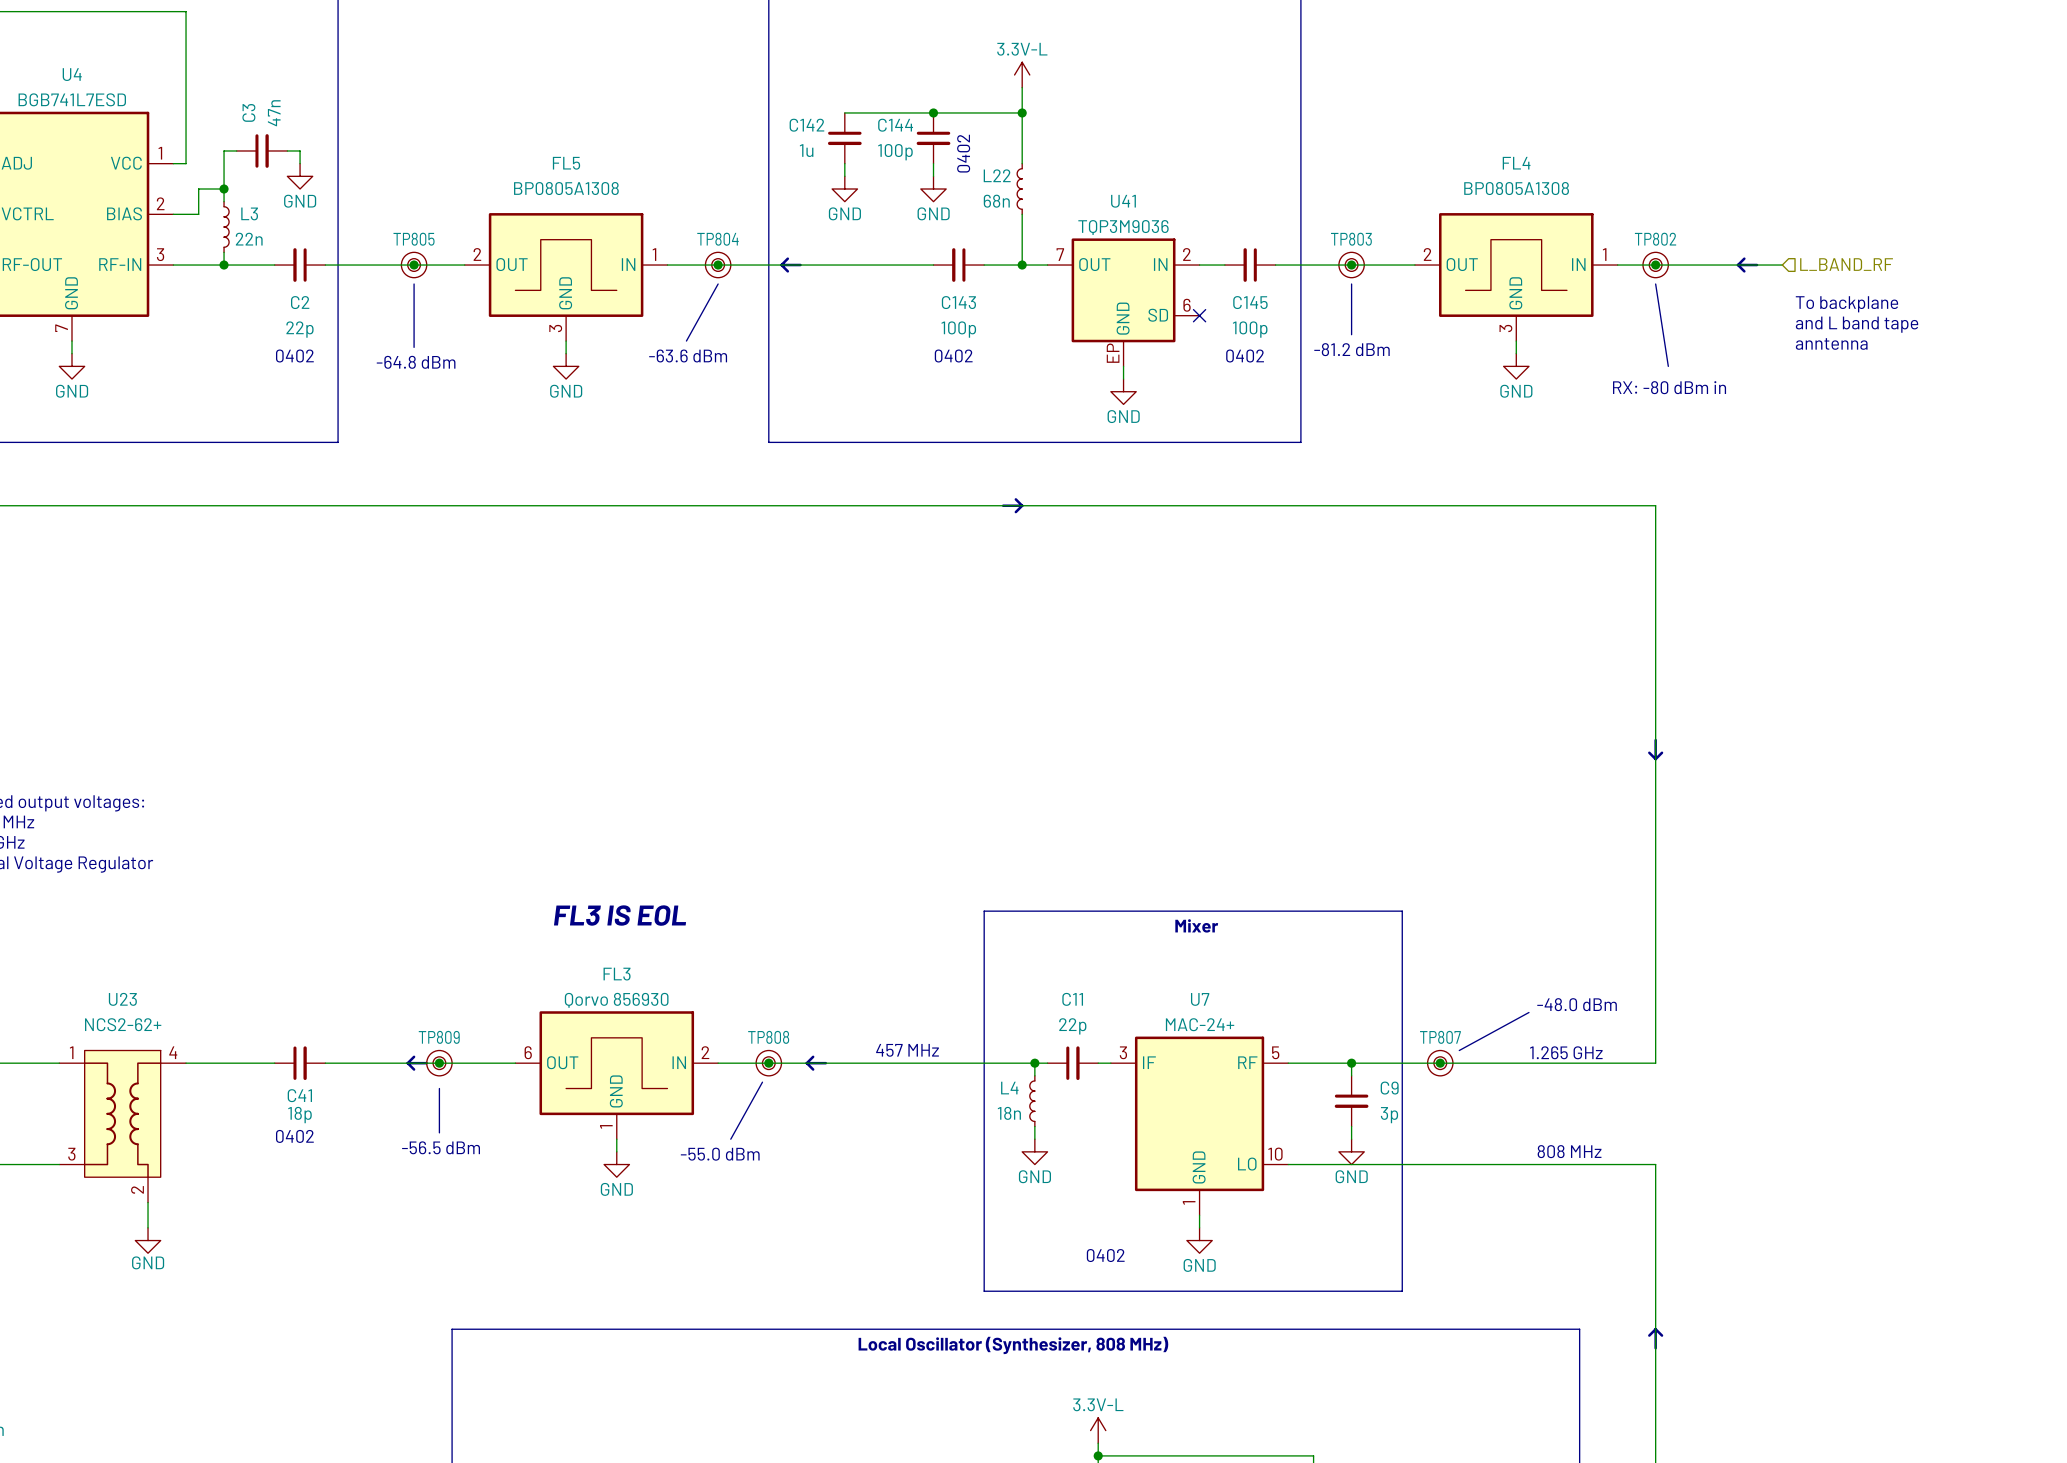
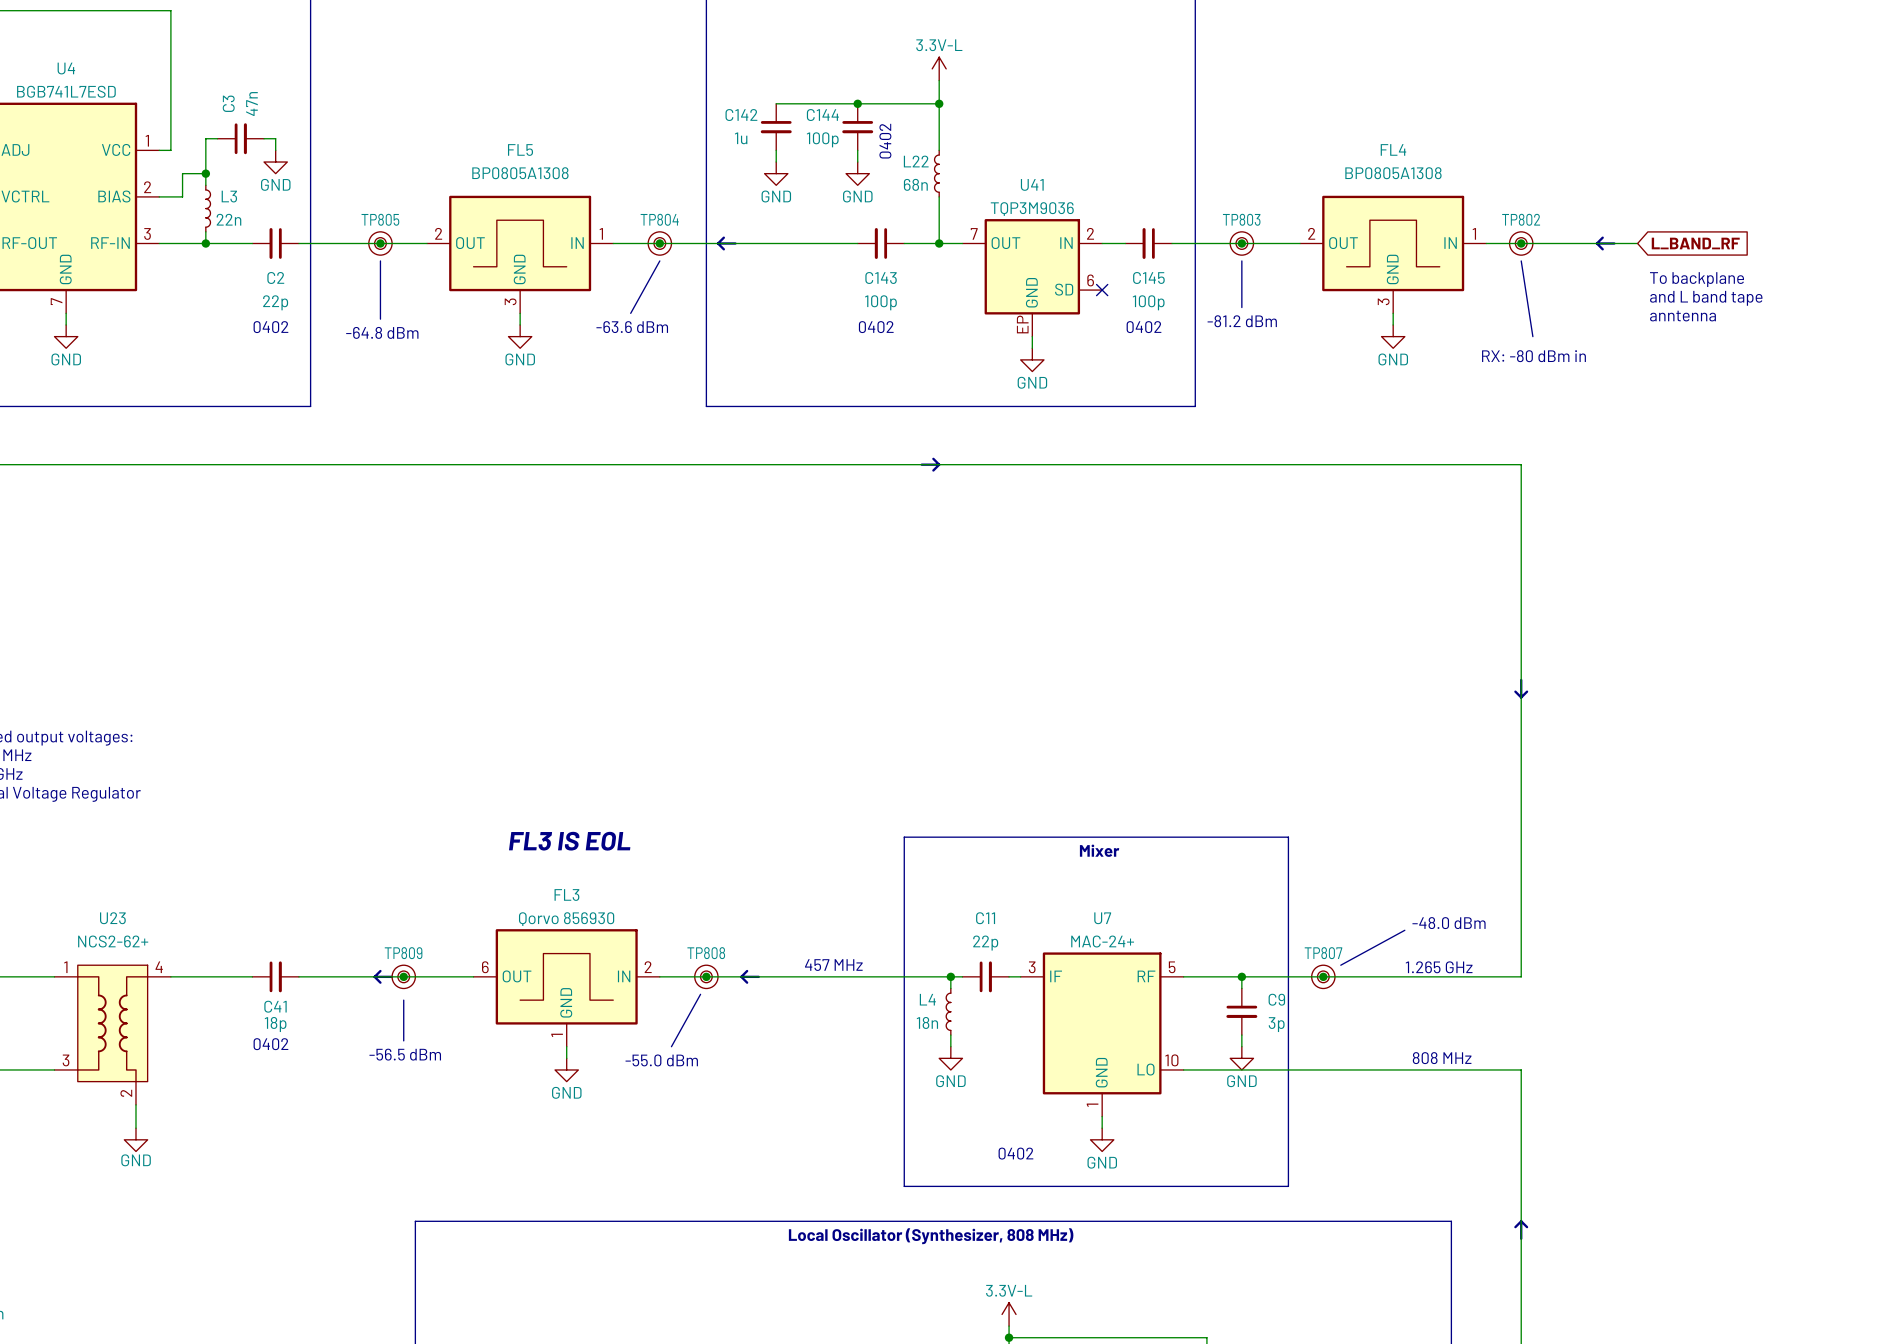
hierarchical label: L_BAND_RF (1846, 264) -> none
global label: none -> L_BAND_RF (1695, 243)

